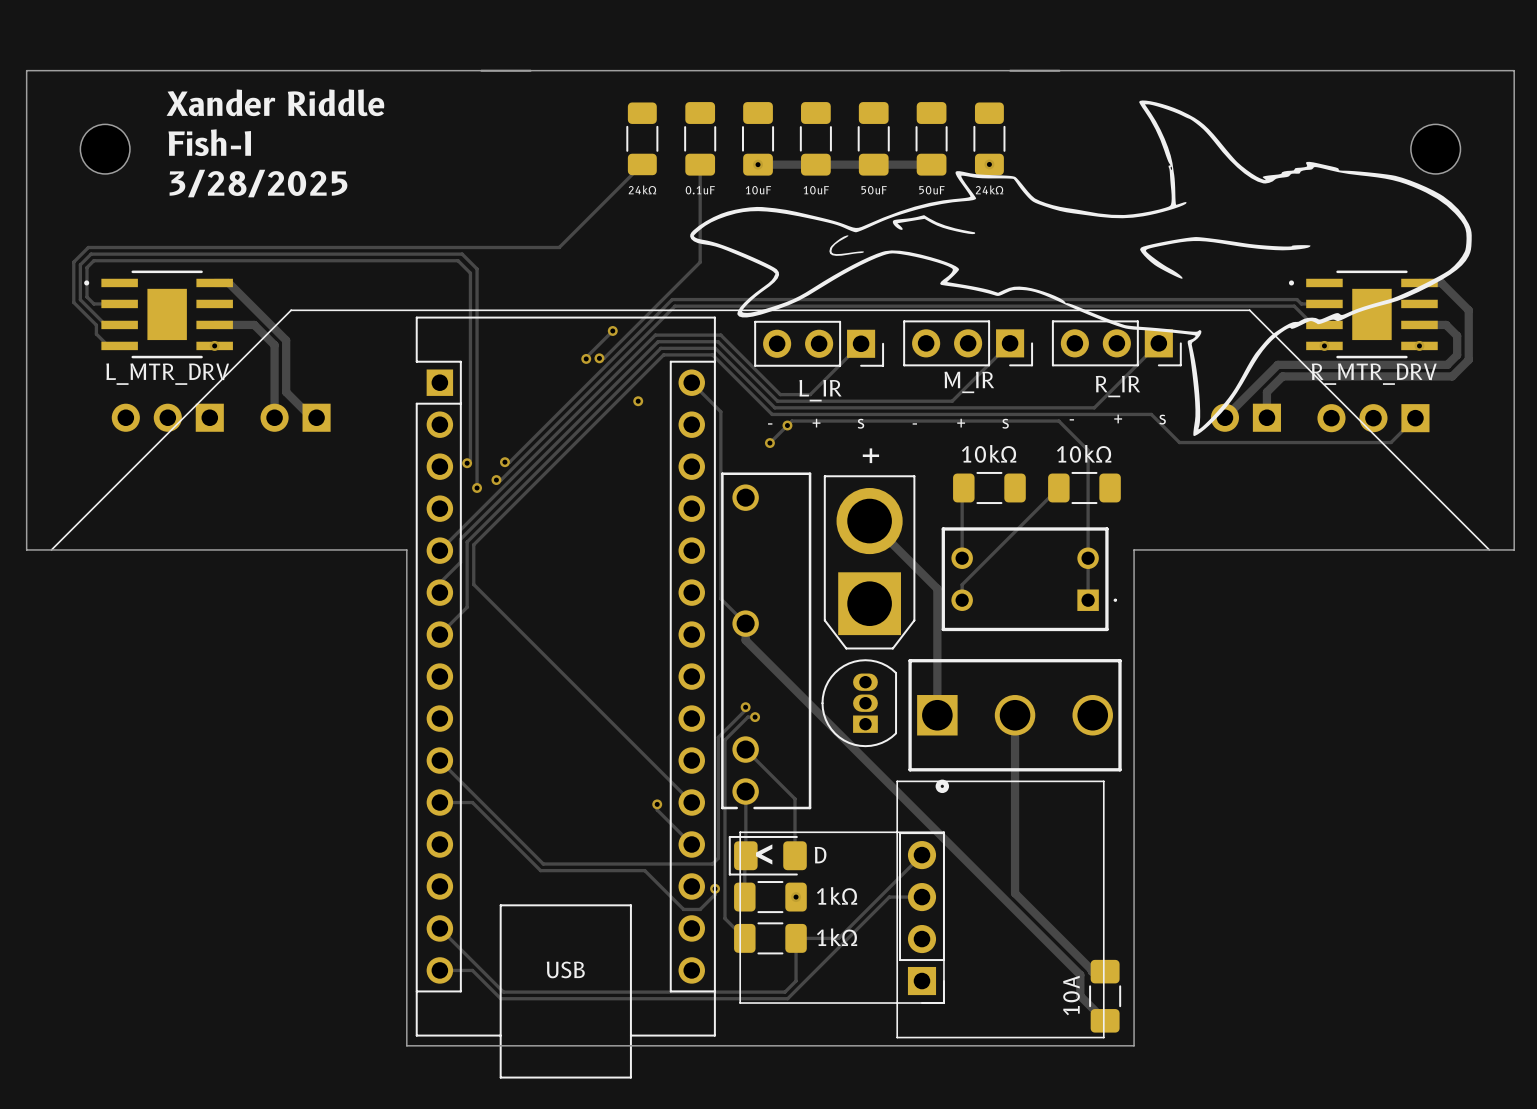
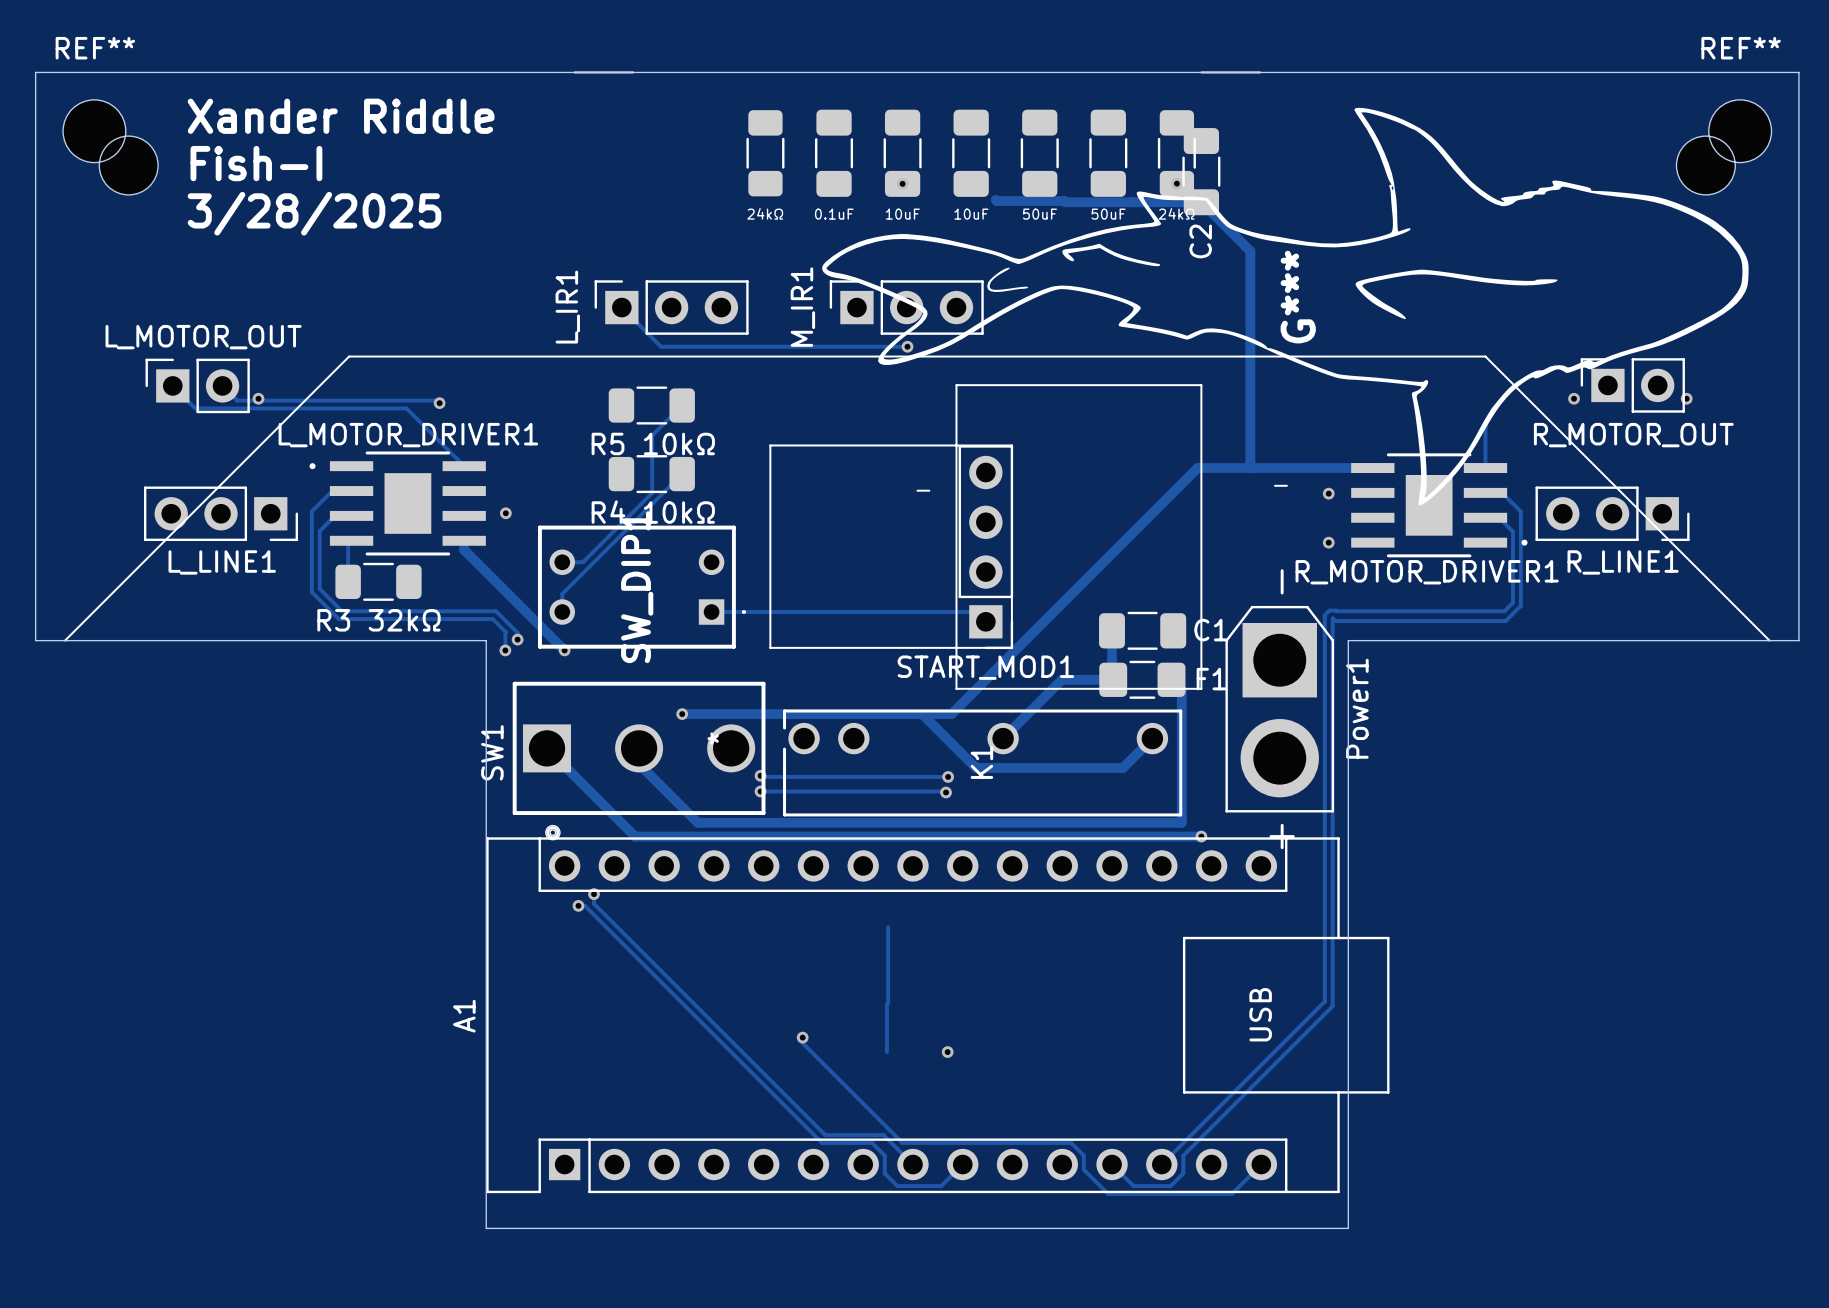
drawing: [690, 100, 1472, 437] -> none
text position: Xander Riddle (275, 102) -> Xander Riddle (341, 116)
REF**: none -> (94, 131)
REF**: none -> (1740, 131)
text position: Fish-I (209, 142) -> Fish-I (256, 163)
C2: none -> (1201, 171)
track: (642, 164) (559, 247) (88, 247) (73, 262) (73, 302) (96, 325) (96, 334) (108, 345) (119, 345) -> none
track: (700, 164) (700, 262) (604, 358) (599, 358) -> none
track: (931, 164) (759, 165) -> none
track: none -> (995, 199) (1065, 202) (1201, 202) (1250, 251) (1250, 468)
text position: 3/28/2025 (258, 183) -> 3/28/2025 (314, 213)
track: none -> (621, 307) (661, 346) (907, 346)
L_IR1: none -> (671, 307)
M_IR1: none -> (906, 307)
G***: none -> (1285, 306)
track: (214, 282) (228, 282) (286, 340) (286, 392) (311, 417) (316, 417) -> none
track: (1419, 282) (1441, 282) (1468, 310) (1468, 359) (1452, 376) (1282, 376) (1266, 392) (1266, 417) -> none
via: none -> (907, 346)
track: (119, 303) (93, 303) (86, 297) (86, 267) (93, 260) (458, 260) (470, 273) (470, 459) (467, 463) -> none
track: (1324, 303) (1301, 303) (1297, 299) (672, 299) (509, 462) (504, 462) -> none
L_MTR_DRV: (158, 314) -> none
R_MTR_DRV: (1363, 314) -> none
track: (119, 324) (105, 324) (80, 299) (80, 264) (91, 254) (462, 254) (477, 268) (477, 487) -> none
track: (214, 324) (254, 324) (274, 345) (274, 417) -> none
track: (1324, 324) (1313, 324) (1294, 306) (674, 306) (501, 480) (496, 480) -> none
track: (1419, 324) (1446, 324) (1457, 335) (1457, 355) (1447, 364) (1277, 364) (1224, 417) -> none
via: (612, 330) -> none
track: (613, 330) (586, 358) -> none
line: none -> (956, 385) (1201, 385) (1201, 688) (956, 688) (956, 385)
R_MOTOR_OUT: none -> (1632, 385)
track: none -> (172, 385) (195, 408) (406, 408) (464, 466)
L_MOTOR_OUT: none -> (197, 385)
track: none -> (222, 385) (237, 400) (437, 400)
L_IR: (819, 343) -> none
track: (861, 343) (810, 394) (780, 394) (720, 335) (655, 335) (439, 550) -> none
M_IR: (968, 343) -> none
R_IR: (1116, 343) -> none
track: (1158, 343) (1094, 407) (774, 407) (715, 348) (660, 348) (467, 542) (467, 607) (439, 634) -> none
track: (1014, 347) (1010, 343) (952, 401) (777, 401) (718, 341) (658, 341) (460, 539) (460, 562) (439, 583) (439, 592) -> none
via: none -> (439, 403)
R5 10kΩ: none -> (651, 405)
track: none -> (682, 405) (652, 435) (652, 493) (582, 562) (562, 562)
via: (586, 358) -> none
via: (599, 358) -> none
track: none -> (1486, 425) (1485, 468)
track: (691, 382) (720, 411) (720, 598) (745, 623) (745, 640) (1080, 974) (1080, 996) (1105, 1020) -> none
line: none -> (770, 445) (1011, 445) (1011, 647) (770, 647) (770, 445)
via: (638, 401) -> none
track: none -> (1372, 468) (1197, 468) (951, 714) (682, 714)
R4 10kΩ: none -> (651, 474)
track: none -> (682, 474) (562, 593) (562, 612)
part: (167, 417) -> none
part: (295, 417) -> none
part: (1245, 417) -> none
text: + (1118, 418) -> none
part: (1373, 418) -> none
track: (1415, 418) (1391, 442) (1179, 442) (1151, 414) (772, 414) (712, 354) (663, 354) (473, 544) (473, 584) (691, 802) -> none
text: s (1162, 419) -> none
track: none -> (351, 491) (332, 491) (311, 511) (311, 592) (338, 619) (492, 619) (505, 632)
text: + (816, 423) -> none
text: s (860, 423) -> none
text: - (914, 423) -> none
text: + (961, 423) -> none
text: s (1005, 423) -> none
via: (787, 425) -> none
track: none -> (1485, 492) (1502, 492) (1520, 511) (1520, 605) (1505, 621) (1335, 621) (1332, 618) (1332, 1006) (1183, 1155) (1183, 1173) (1170, 1186) (1133, 1186) (1112, 1164)
via: none -> (1328, 493)
L_MOTOR_DRIVER1: none -> (397, 503)
R_MOTOR_DRIVER1: none -> (1439, 505)
L_LINE1: none -> (220, 513)
via: none -> (505, 513)
R_LINE1: none -> (1612, 513)
track: (769, 443) (791, 421) (1058, 421) (1088, 450) (1088, 600) -> none
via: (769, 443) -> none
track: none -> (351, 515) (334, 515) (319, 531) (319, 588) (342, 611) (496, 611) (517, 632) (517, 639)
track: none -> (1485, 517) (1498, 517) (1513, 531) (1513, 602) (1504, 611) (1329, 610) (1324, 615) (1324, 1001) (1161, 1164)
via: (504, 462) -> none
via: (467, 463) -> none
track: none -> (351, 540) (348, 544) (348, 581)
track: none -> (464, 540) (464, 550) (564, 650)
via: none -> (1328, 542)
START_MOD1: none -> (985, 547)
via: (496, 480) -> none
via: (477, 487) -> none
track: (963, 487) (962, 489) (962, 558) -> none
10kΩ: (989, 487) -> none
track: (1058, 487) (962, 584) (962, 600) (956, 594) -> none
10kΩ: (1084, 487) -> none
R3 32kΩ: none -> (378, 581)
SW_DIP1: none -> (641, 587)
track: (869, 521) (937, 588) (937, 715) -> none
track: none -> (711, 612) (976, 612) (985, 621)
track: none -> (1111, 630) (1113, 679) (1061, 679) (1003, 738)
C1: none -> (1142, 630)
track: none -> (505, 631) (505, 650)
via: none -> (517, 639)
via: none -> (505, 650)
via: none -> (564, 650)
part: (869, 562) -> none
part: (1029, 579) -> none
F1: none -> (1142, 679)
track: none -> (1171, 679) (1181, 690) (1181, 822) (697, 822) (639, 764) (639, 748)
Power1: none -> (1279, 709)
via: none -> (682, 714)
track: none -> (922, 714) (976, 767) (1123, 767) (1152, 738)
track: none -> (547, 748) (635, 836) (1201, 836)
part: (766, 640) -> none
SW1: none -> (639, 760)
K1: none -> (982, 762)
track: none -> (760, 775) (948, 776)
via: none -> (760, 775)
via: none -> (948, 776)
track: none -> (760, 791) (946, 792)
via: none -> (760, 791)
via: none -> (946, 792)
part: (565, 697) -> none
part: (859, 703) -> none
track: (745, 707) (745, 710) (718, 737) (718, 858) (712, 864) (543, 864) (439, 760) -> none
via: (745, 707) -> none
via: none -> (1201, 836)
track: (1015, 715) (1015, 893) (1091, 971) (1105, 971) -> none
track: (755, 717) (747, 717) (724, 740) (724, 918) (744, 938) -> none
via: (755, 717) -> none
part: (1015, 725) -> none
track: (745, 749) (795, 798) (795, 855) -> none
track: none -> (594, 894) (594, 903) (825, 1135) (883, 1135) (912, 1164)
via: none -> (594, 894)
track: none -> (578, 905) (584, 905) (822, 1142) (872, 1142) (884, 1155) (884, 1173) (897, 1186) (941, 1186) (962, 1164)
via: none -> (578, 905)
line: (897, 781) (1103, 781) (1103, 1037) (897, 1037) (897, 781) -> none
track: (439, 802) (472, 802) (540, 870) (644, 870) (683, 909) (700, 909) (715, 894) (715, 888) -> none
track: (657, 804) (657, 809) (691, 844) -> none
via: (657, 804) -> none
line: (740, 832) (943, 832) (943, 1003) (740, 1003) (740, 832) -> none
text: < (764, 854) -> none
D: (767, 855) -> none
track: (921, 855) (838, 938) (796, 938) (796, 981) (784, 992) (503, 992) (439, 928) -> none
A1: none -> (937, 1015)
track: none -> (802, 1037) (802, 1043) (902, 1142) (1071, 1142) (1083, 1155) (1083, 1169) (1108, 1193) (1231, 1193) (1261, 1164)
via: none -> (802, 1037)
via: (715, 888) -> none
1kΩ: (770, 897) -> none
track: (921, 897) (889, 897) (787, 998) (500, 998) (472, 970) (439, 970) -> none
part: (921, 918) -> none
1kΩ: (770, 938) -> none
10A: (1105, 996) -> none

